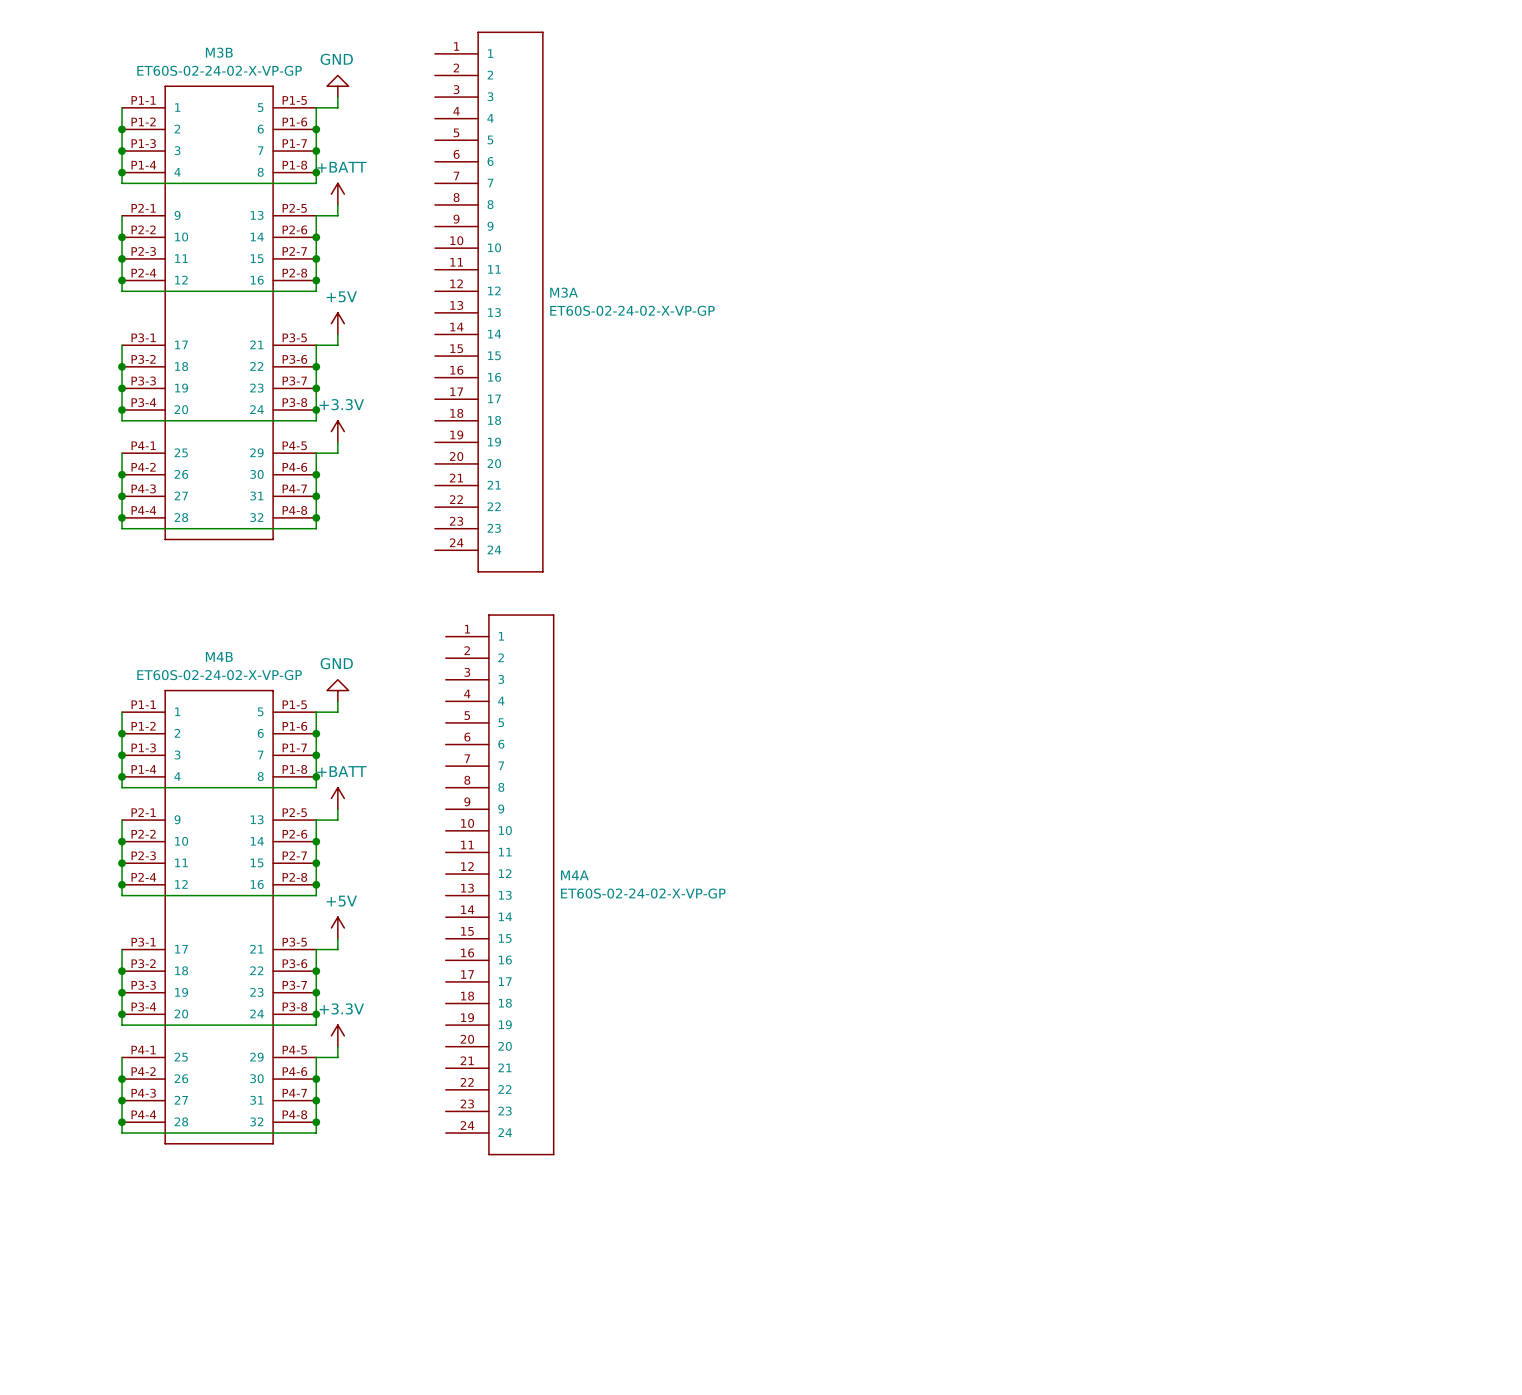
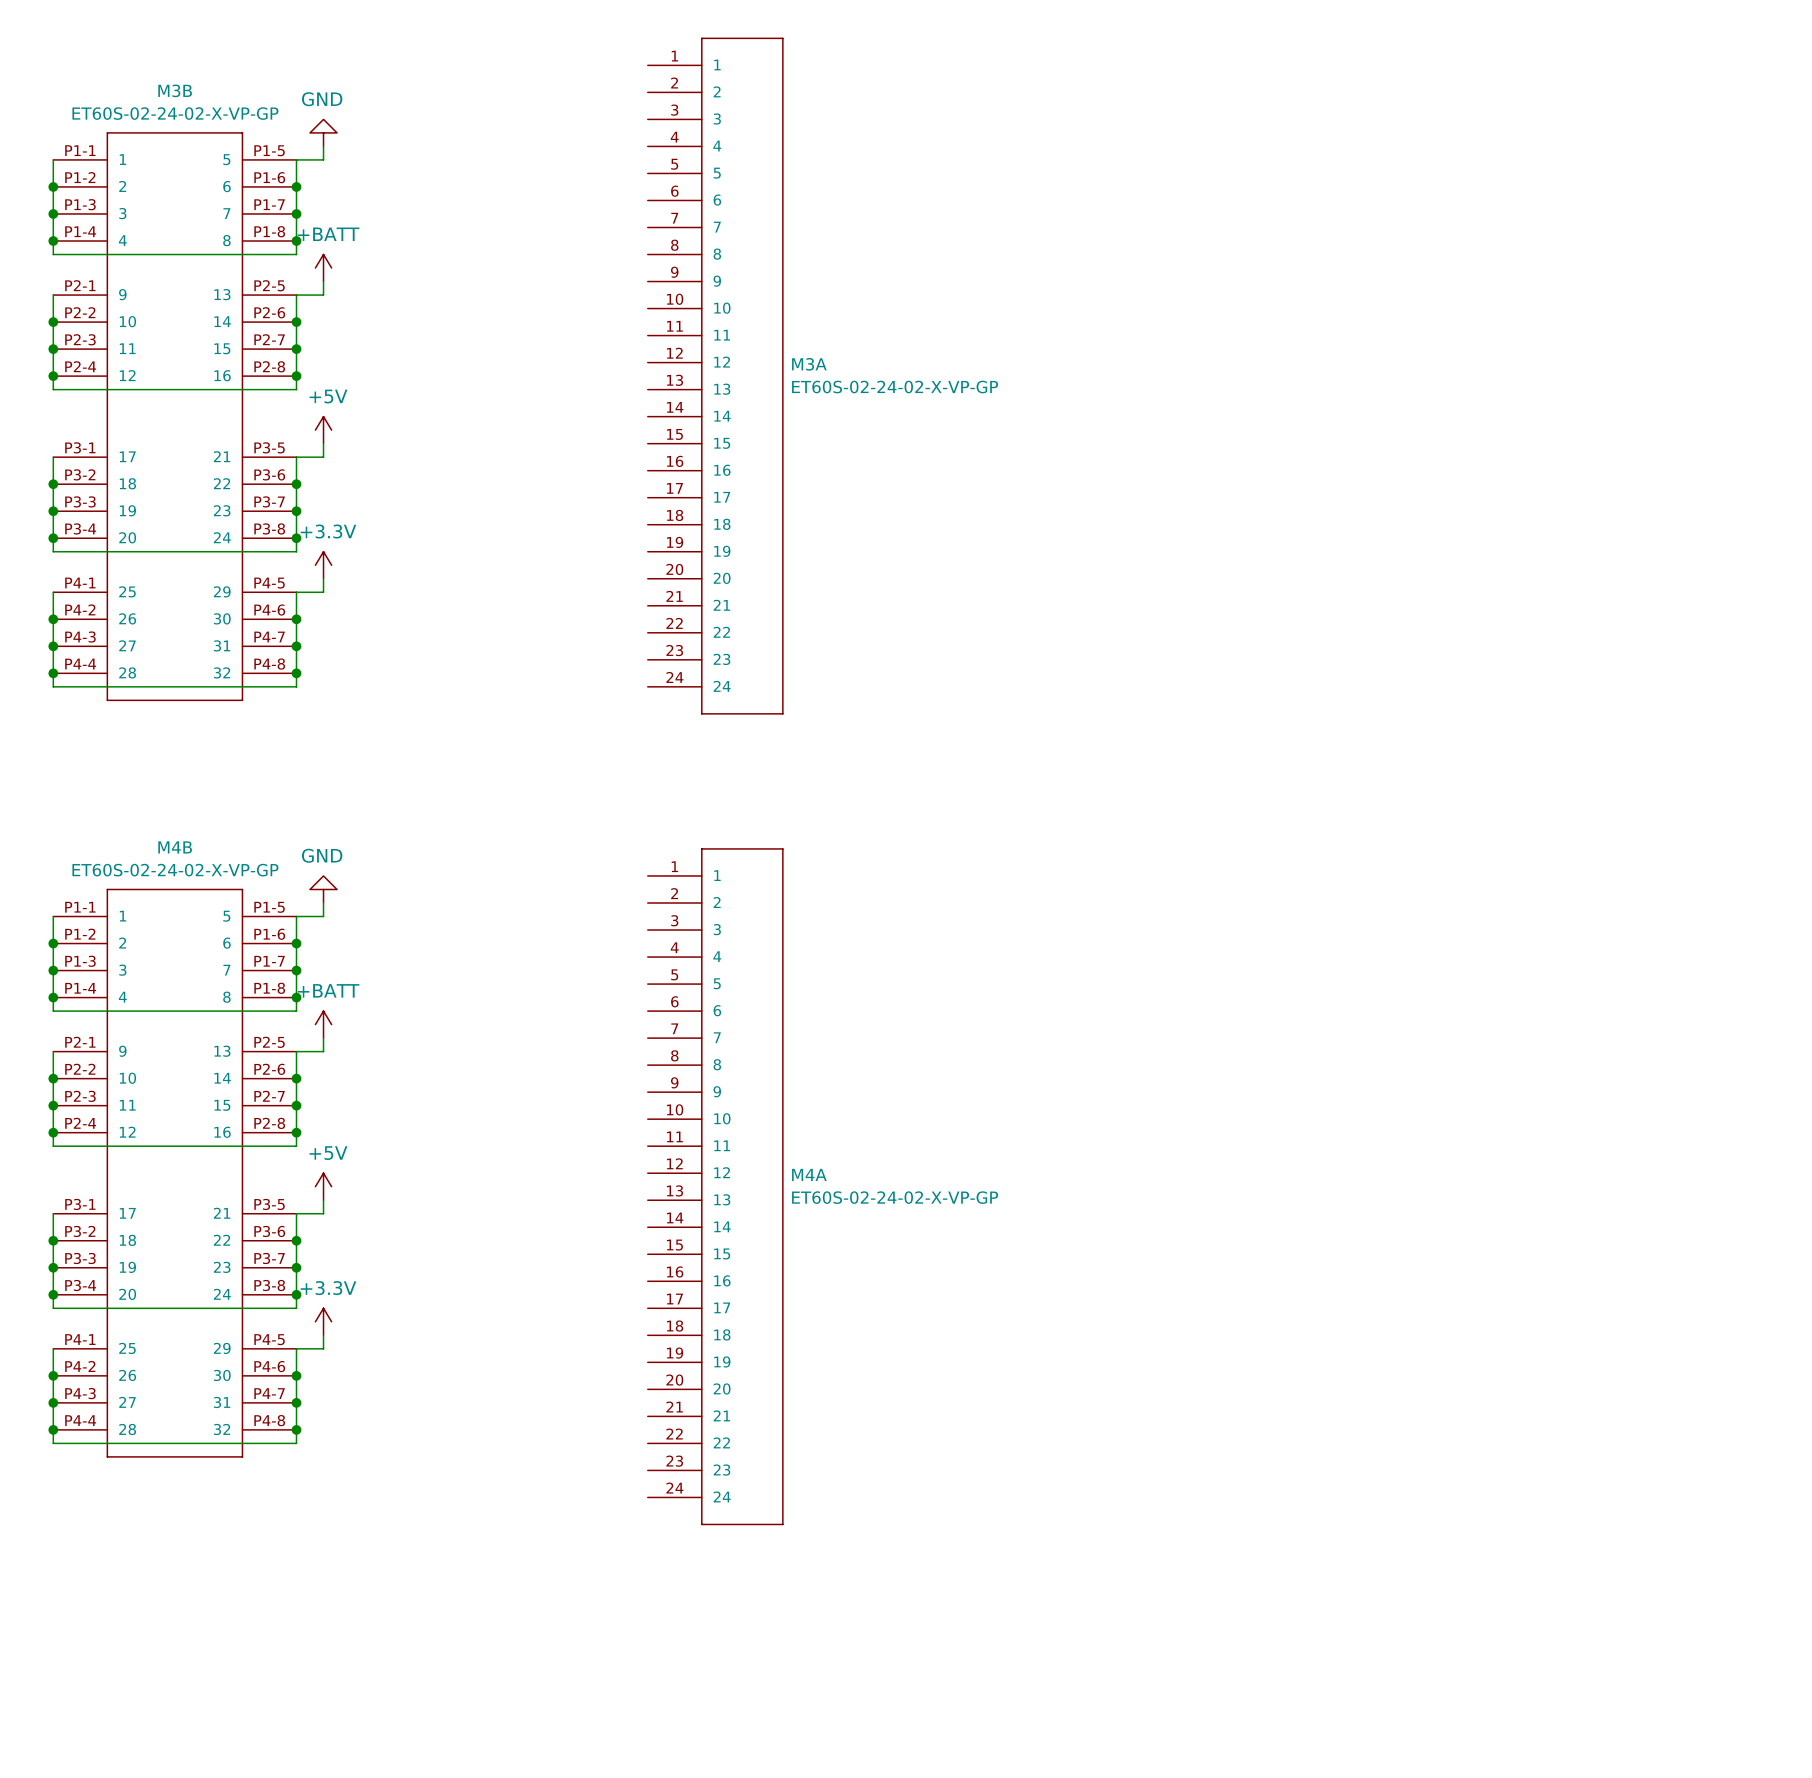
M3A position: (488, 302) -> (715, 376)
M4A position: (499, 884) -> (715, 1186)

